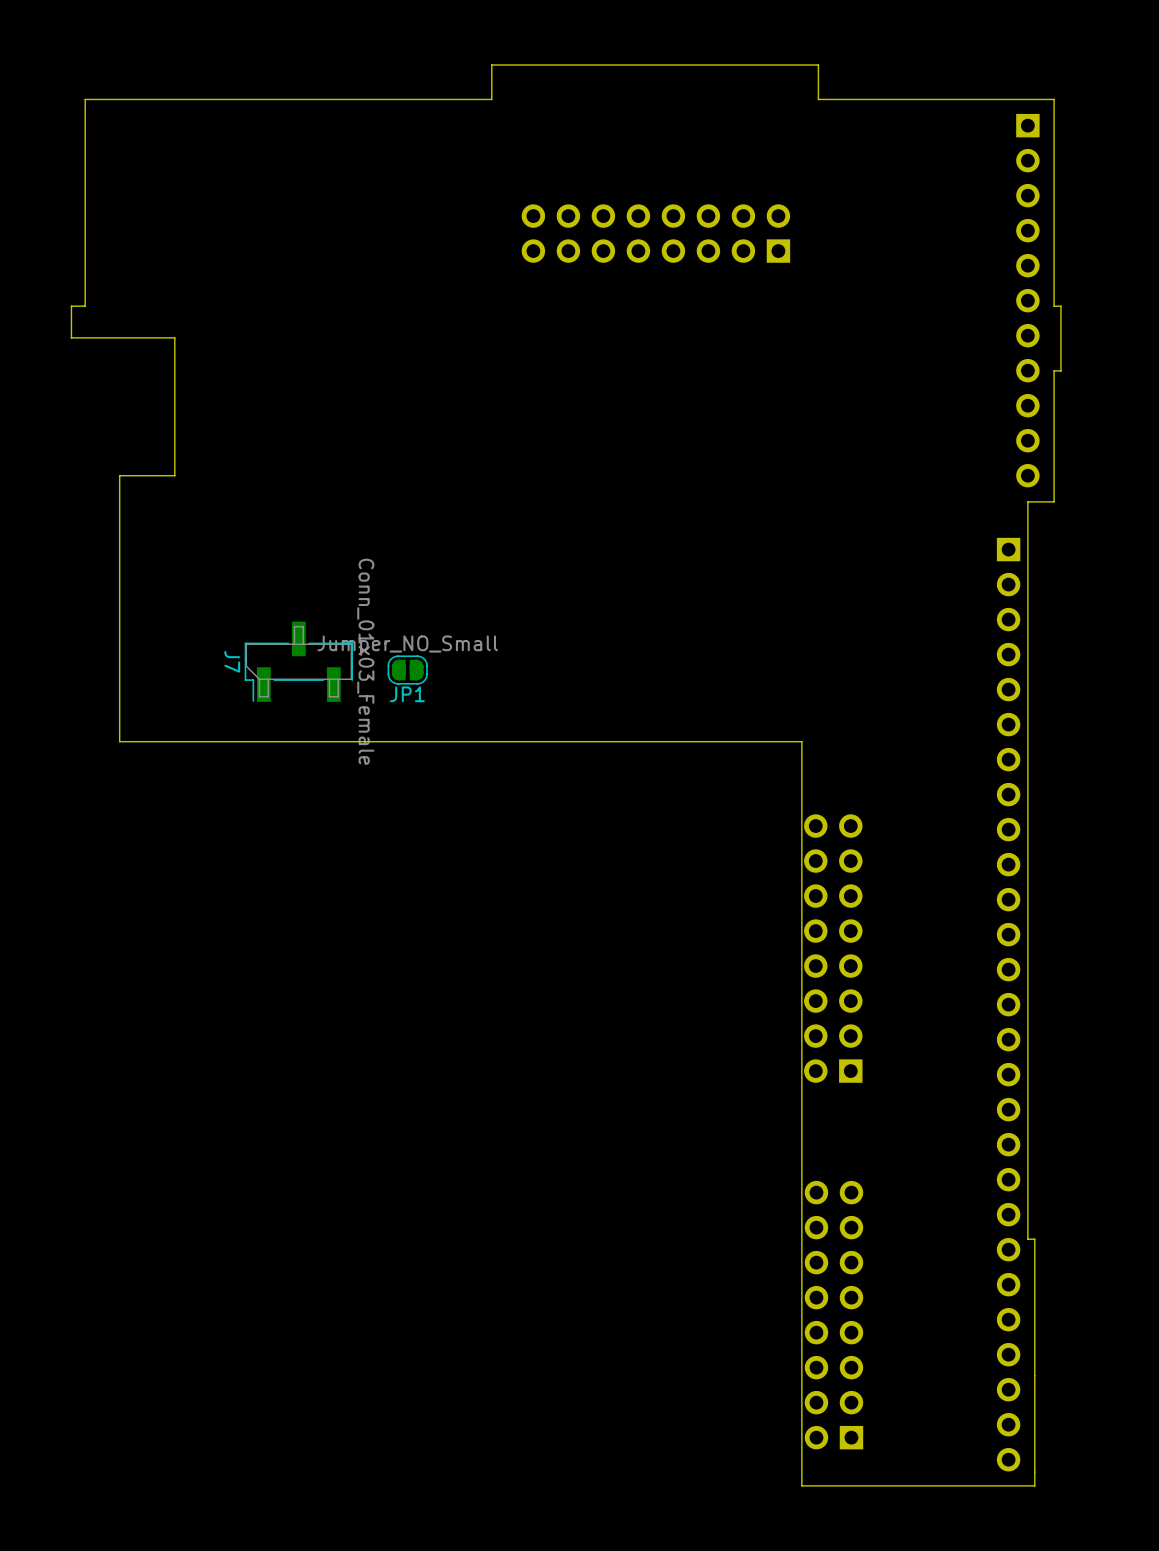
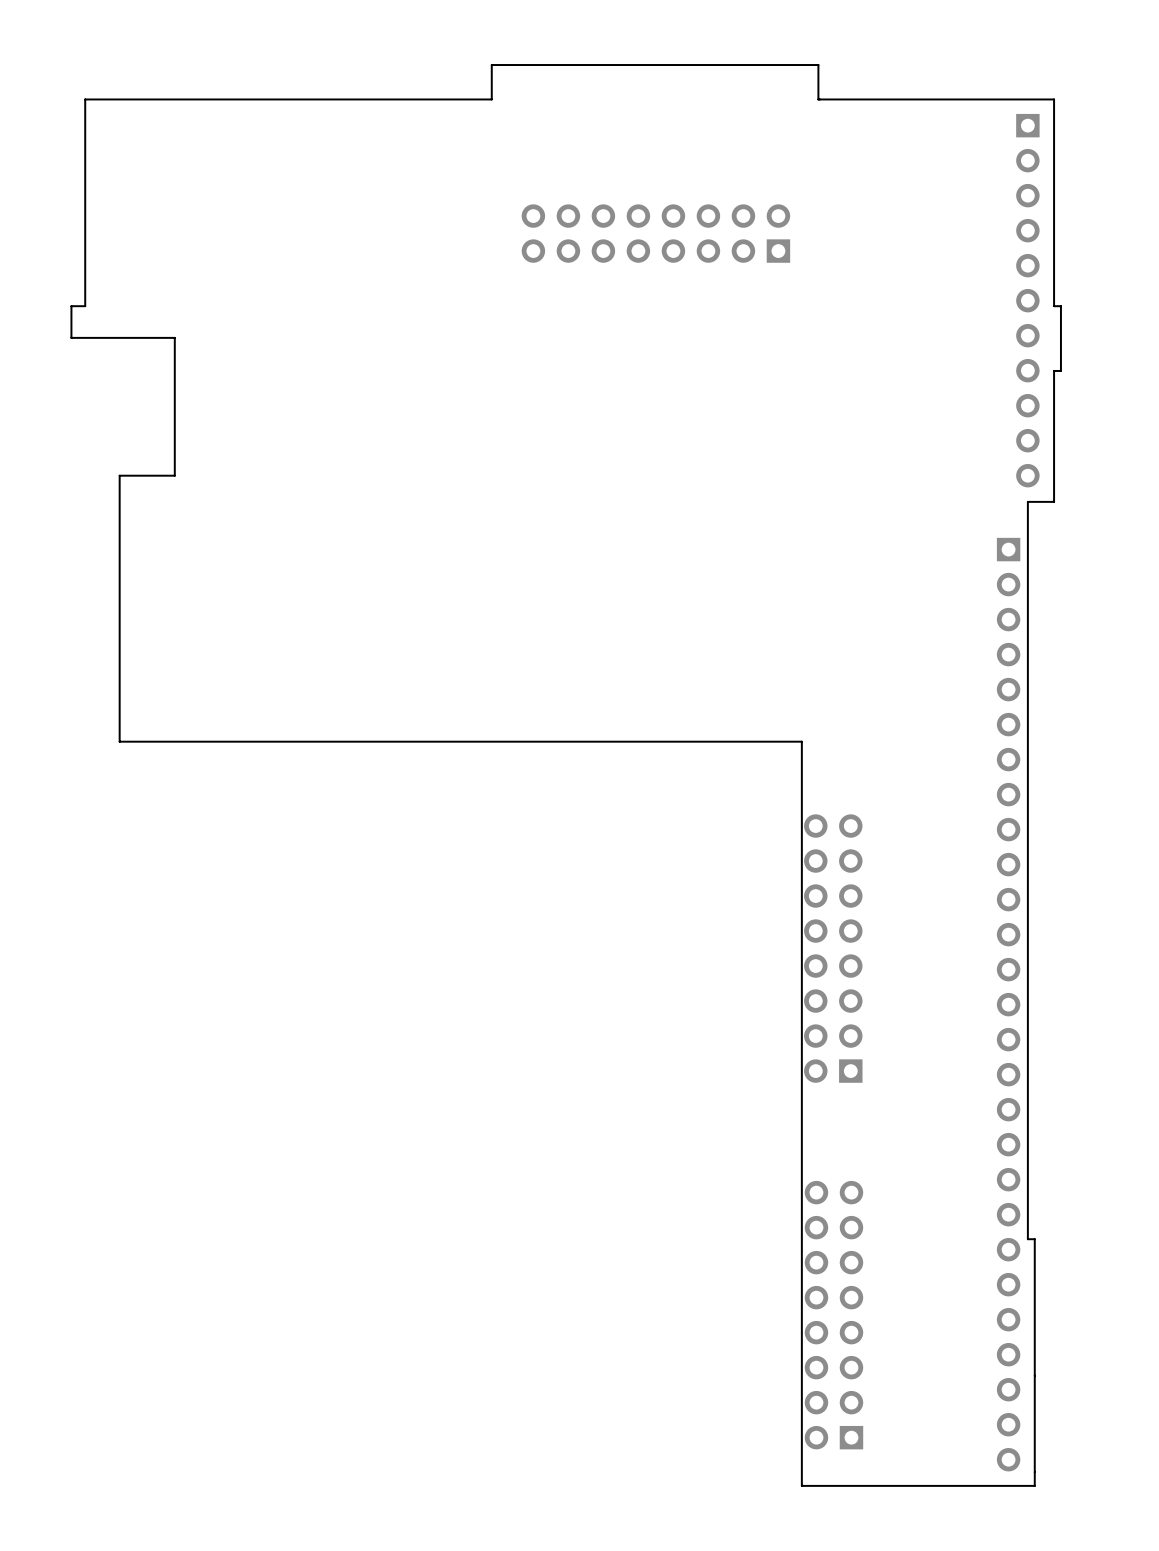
J7: Conn_01x03_Female (298, 661) -> none
JP1: Jumper_NO_Small (407, 670) -> none

